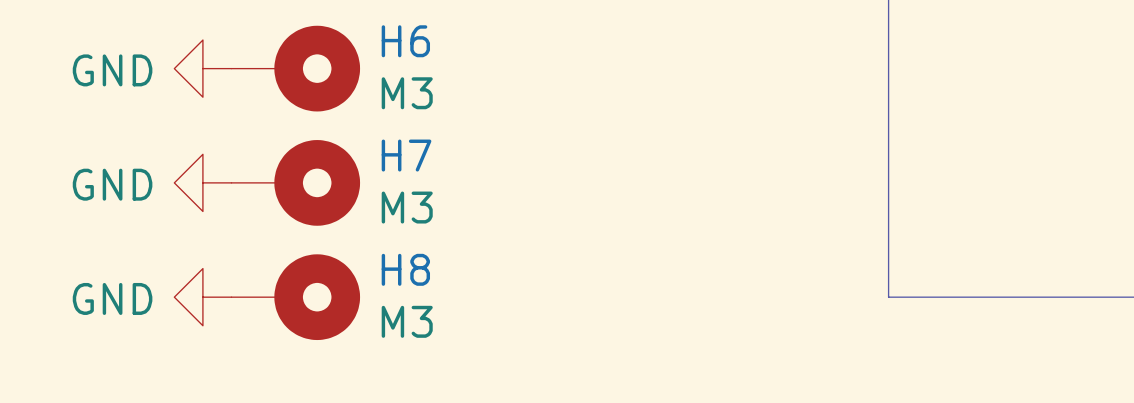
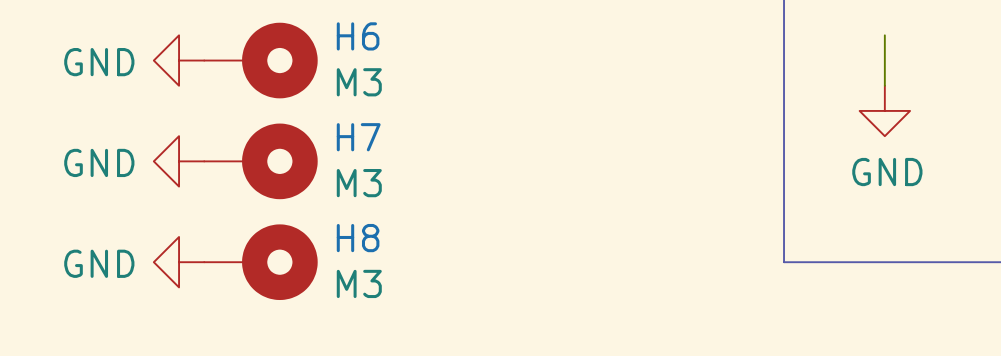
wire: none -> (884, 35) (884, 85)
power symbol: none -> GND (884, 110)

